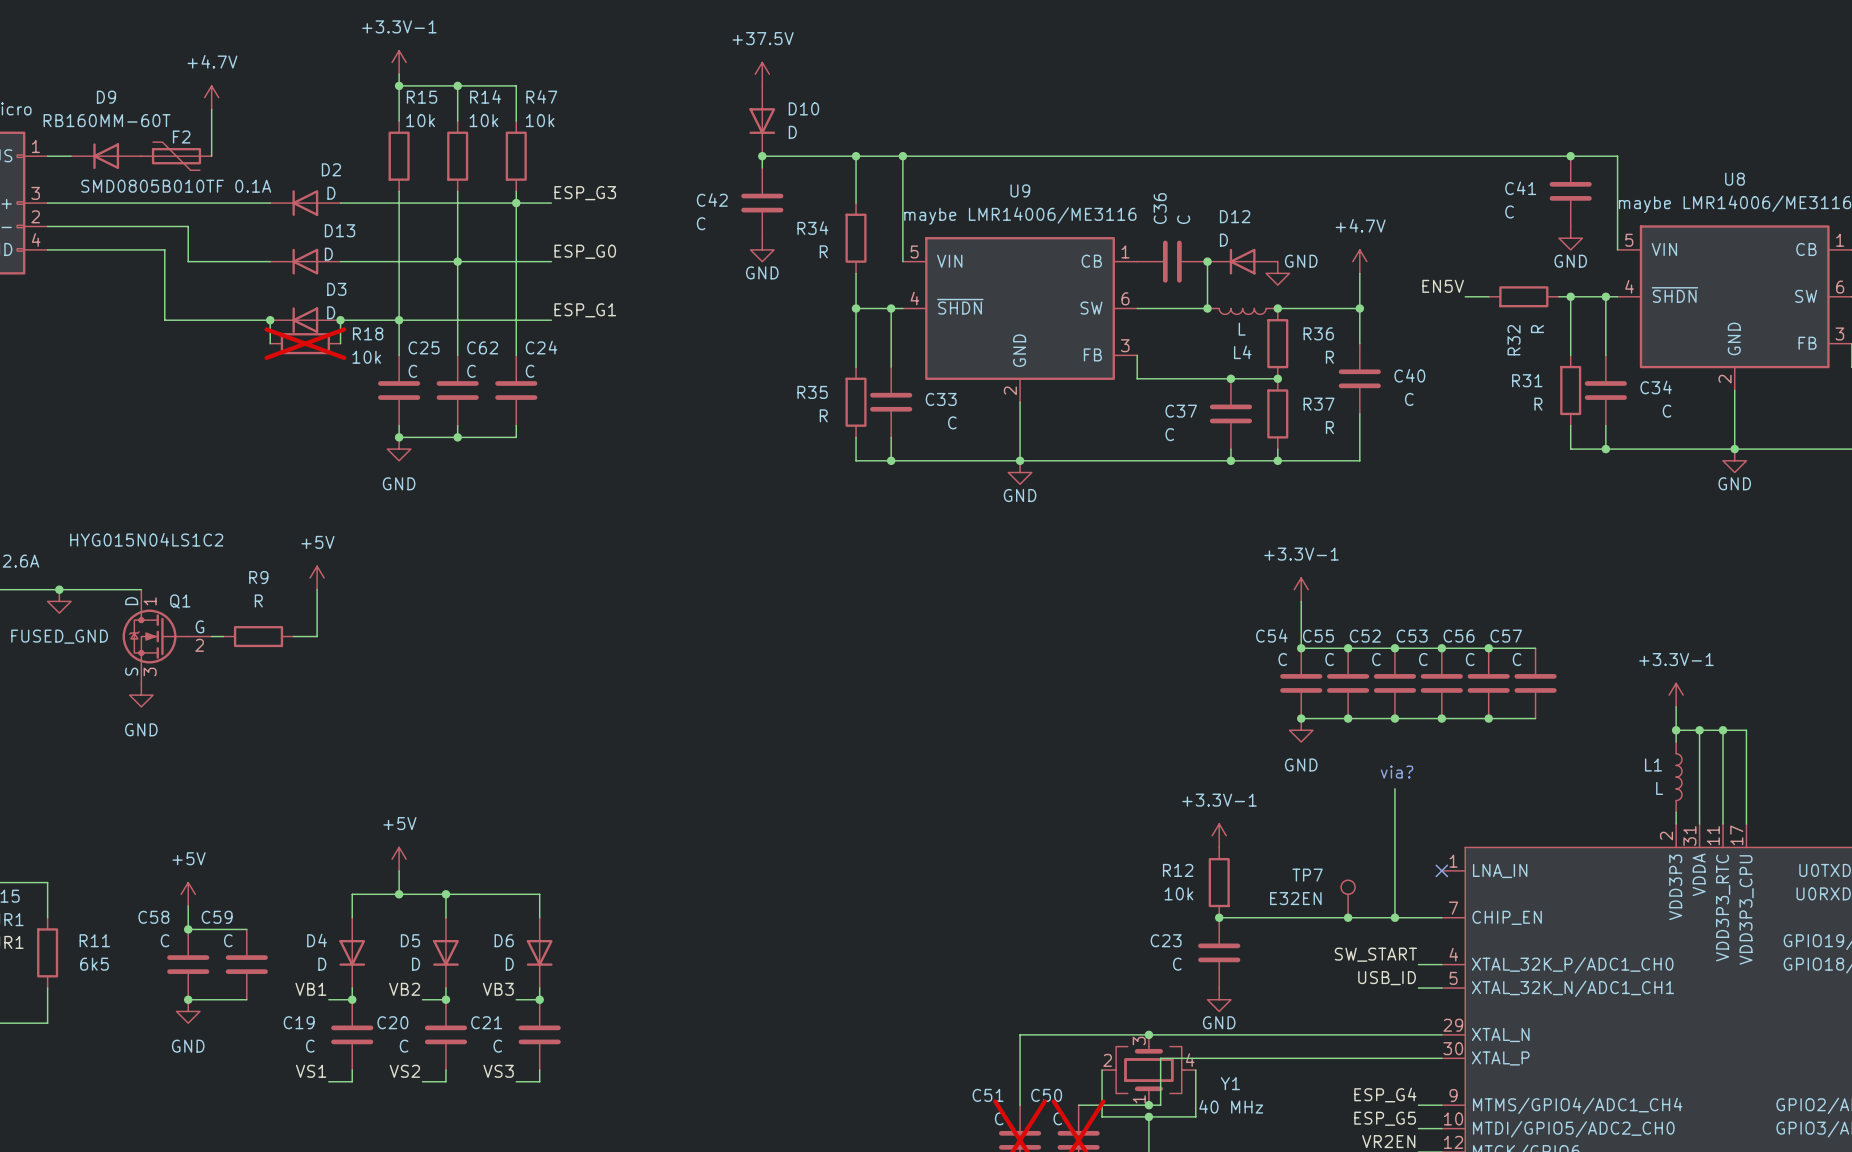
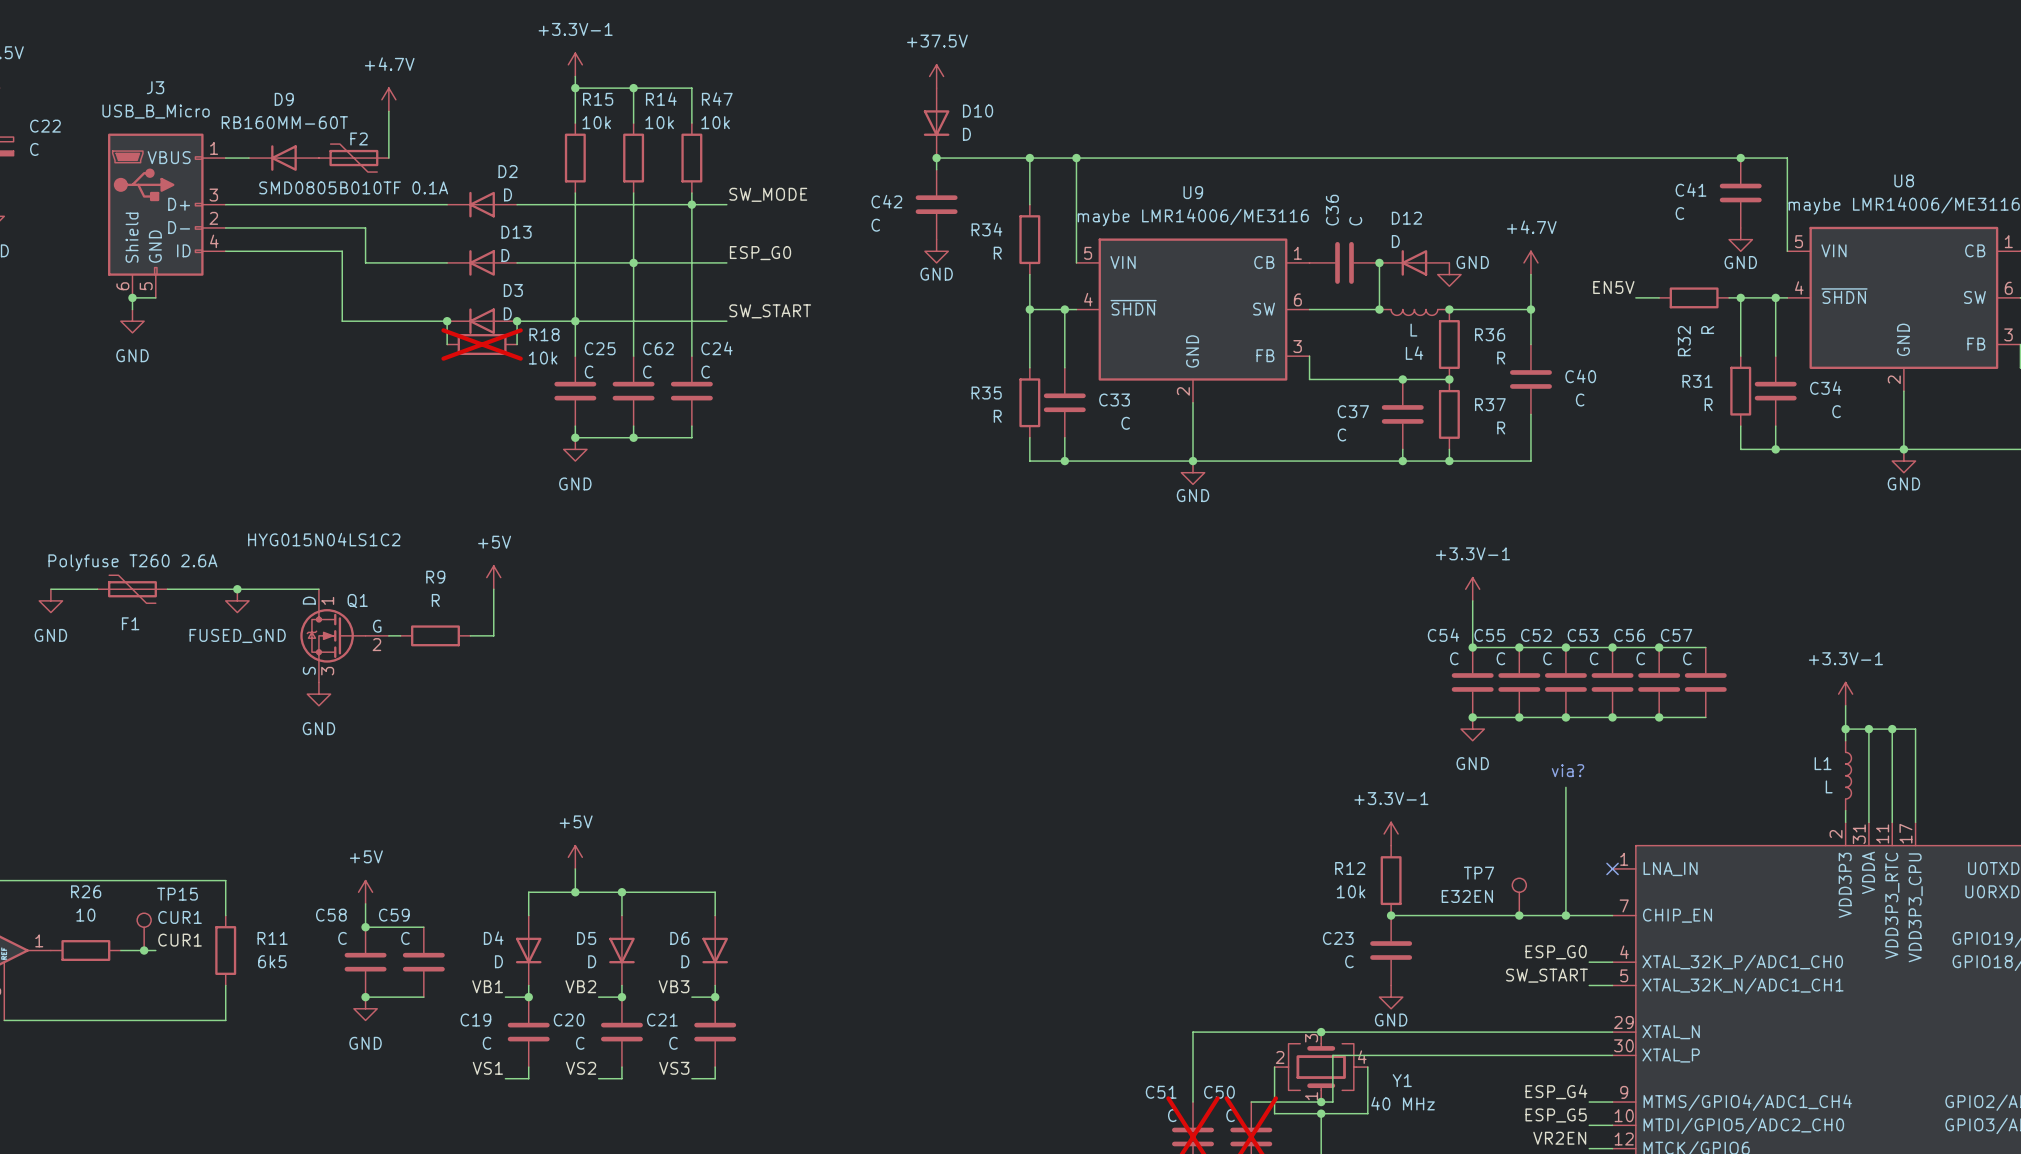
label: ESP_G3 (585, 193) -> SW_MODE (768, 194)
label: ESP_G1 (585, 310) -> SW_START (770, 311)
label: SW_START (1375, 954) -> ESP_G0 (1556, 952)
label: USB_ID (1387, 978) -> SW_START (1546, 975)

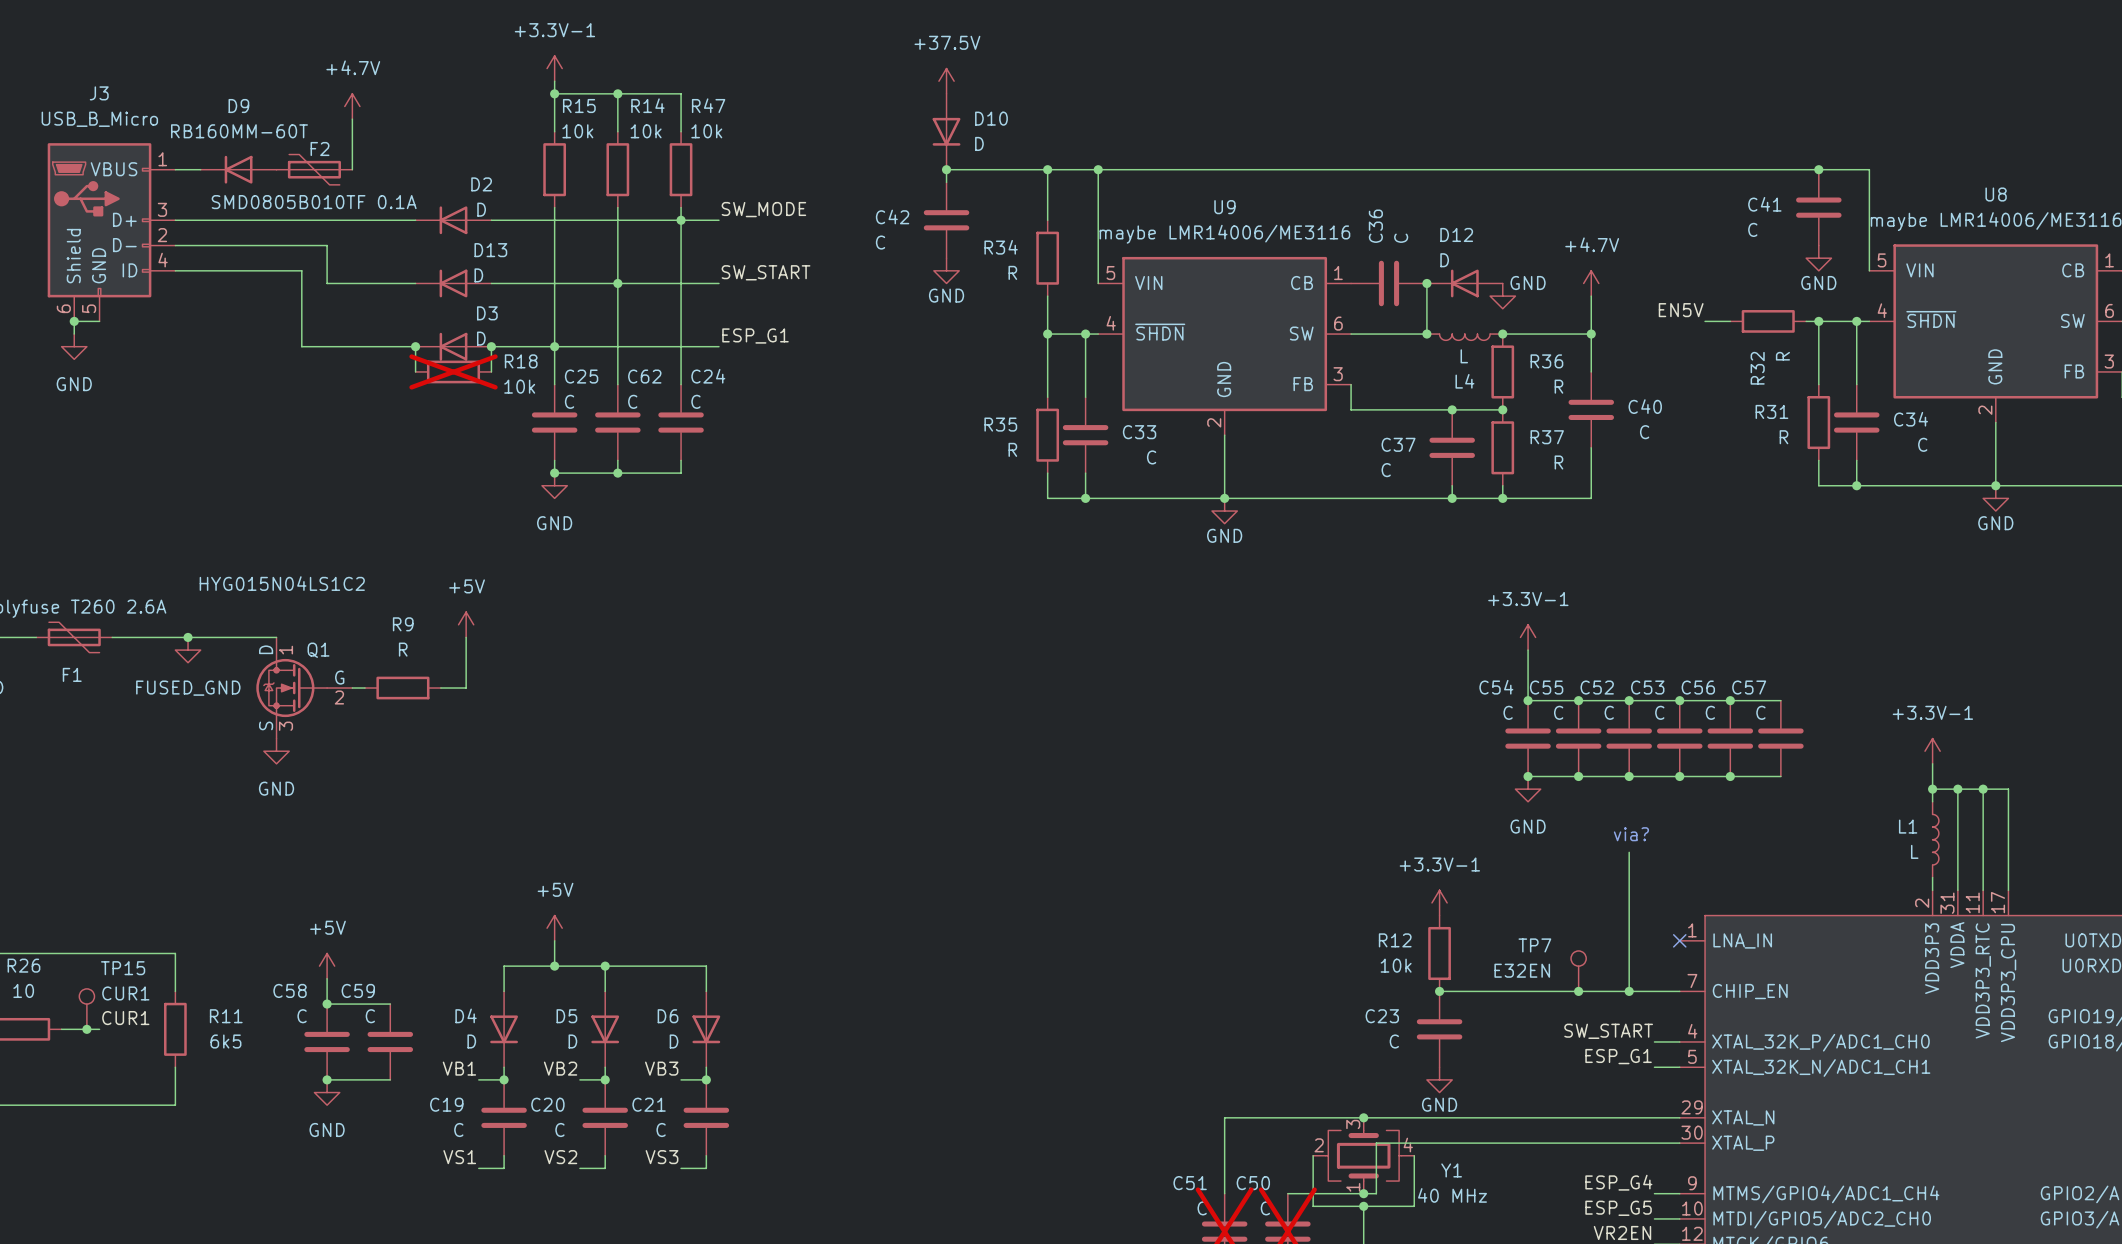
label: ESP_G0 (760, 253) -> SW_START (766, 272)
label: SW_START (770, 311) -> ESP_G1 (755, 336)
label: ESP_G0 (1556, 952) -> SW_START (1608, 1031)
label: SW_START (1546, 975) -> ESP_G1 (1618, 1056)

